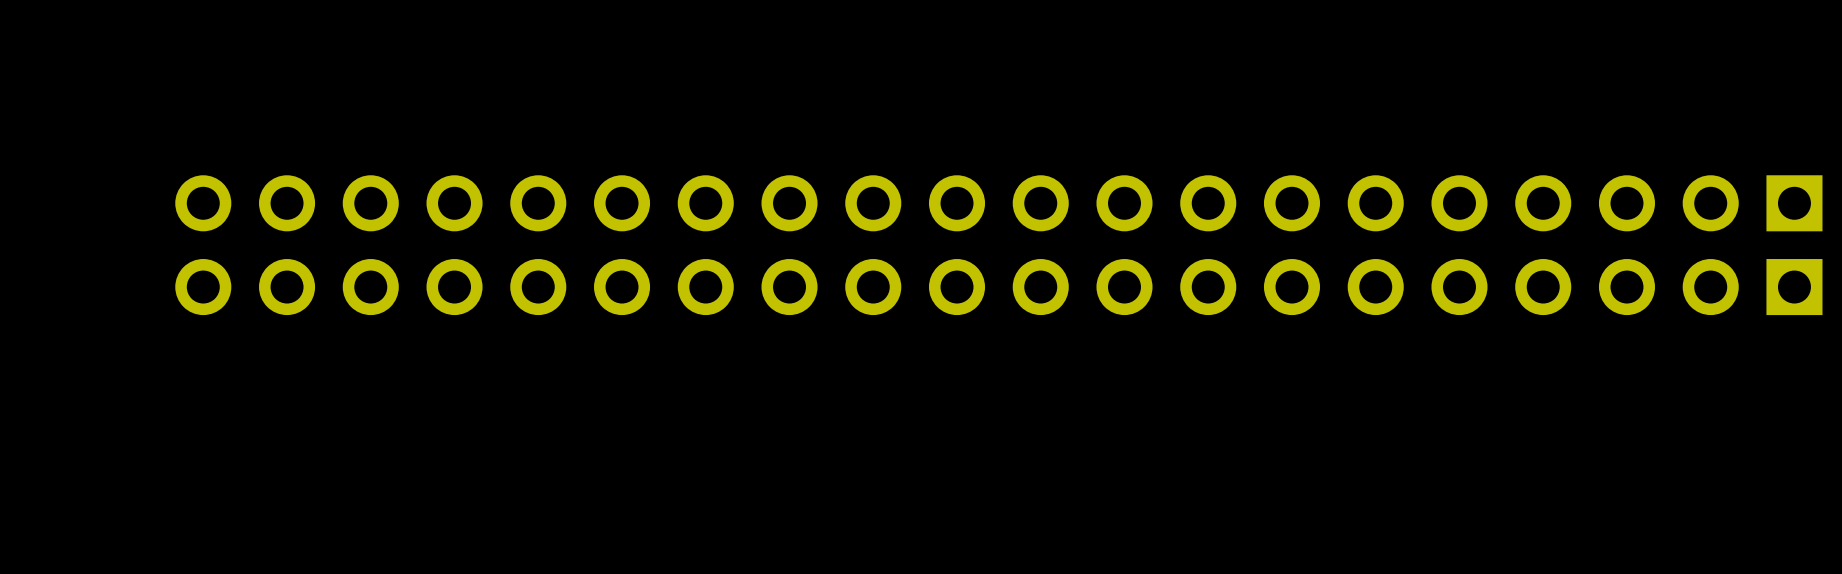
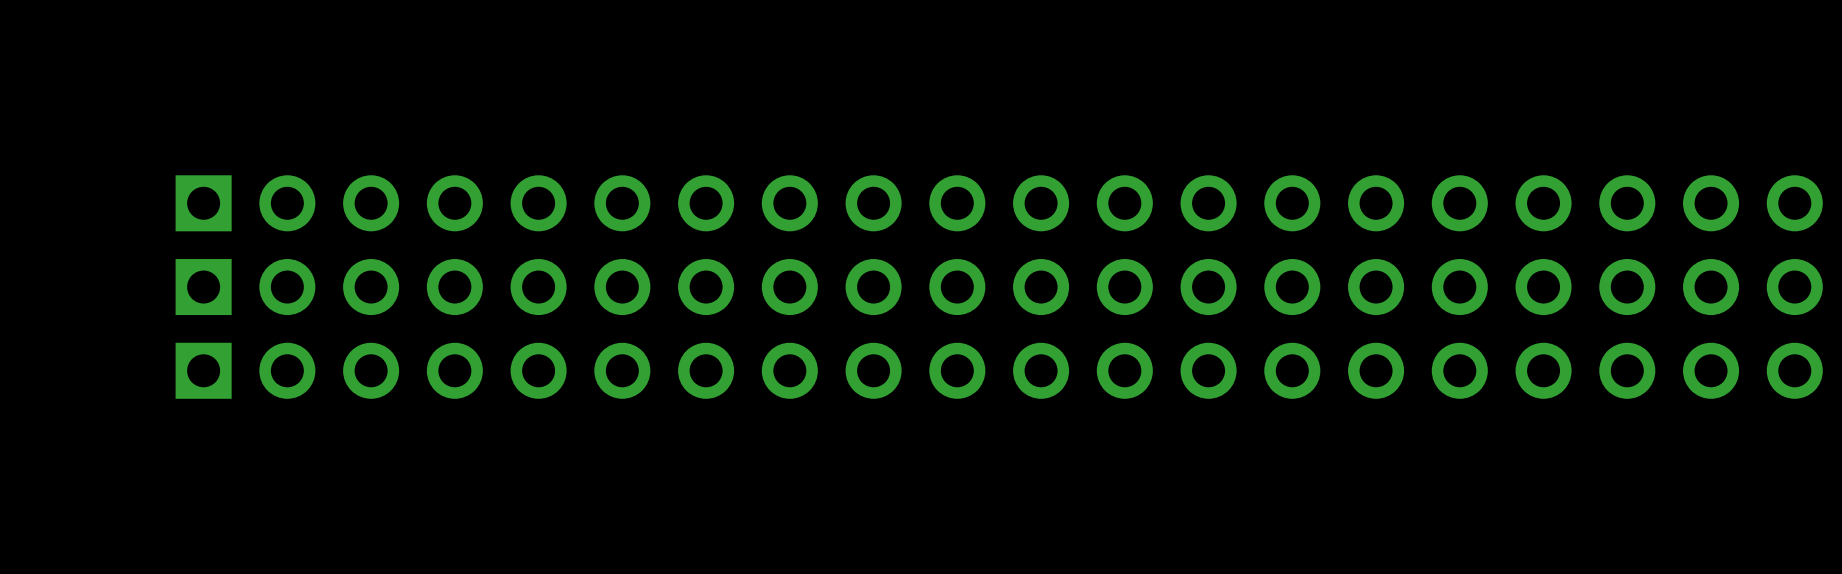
part rotation: 0° (998, 203) -> 180° (999, 203)
part rotation: 0° (998, 287) -> 180° (999, 287)
part: none -> (999, 370)

